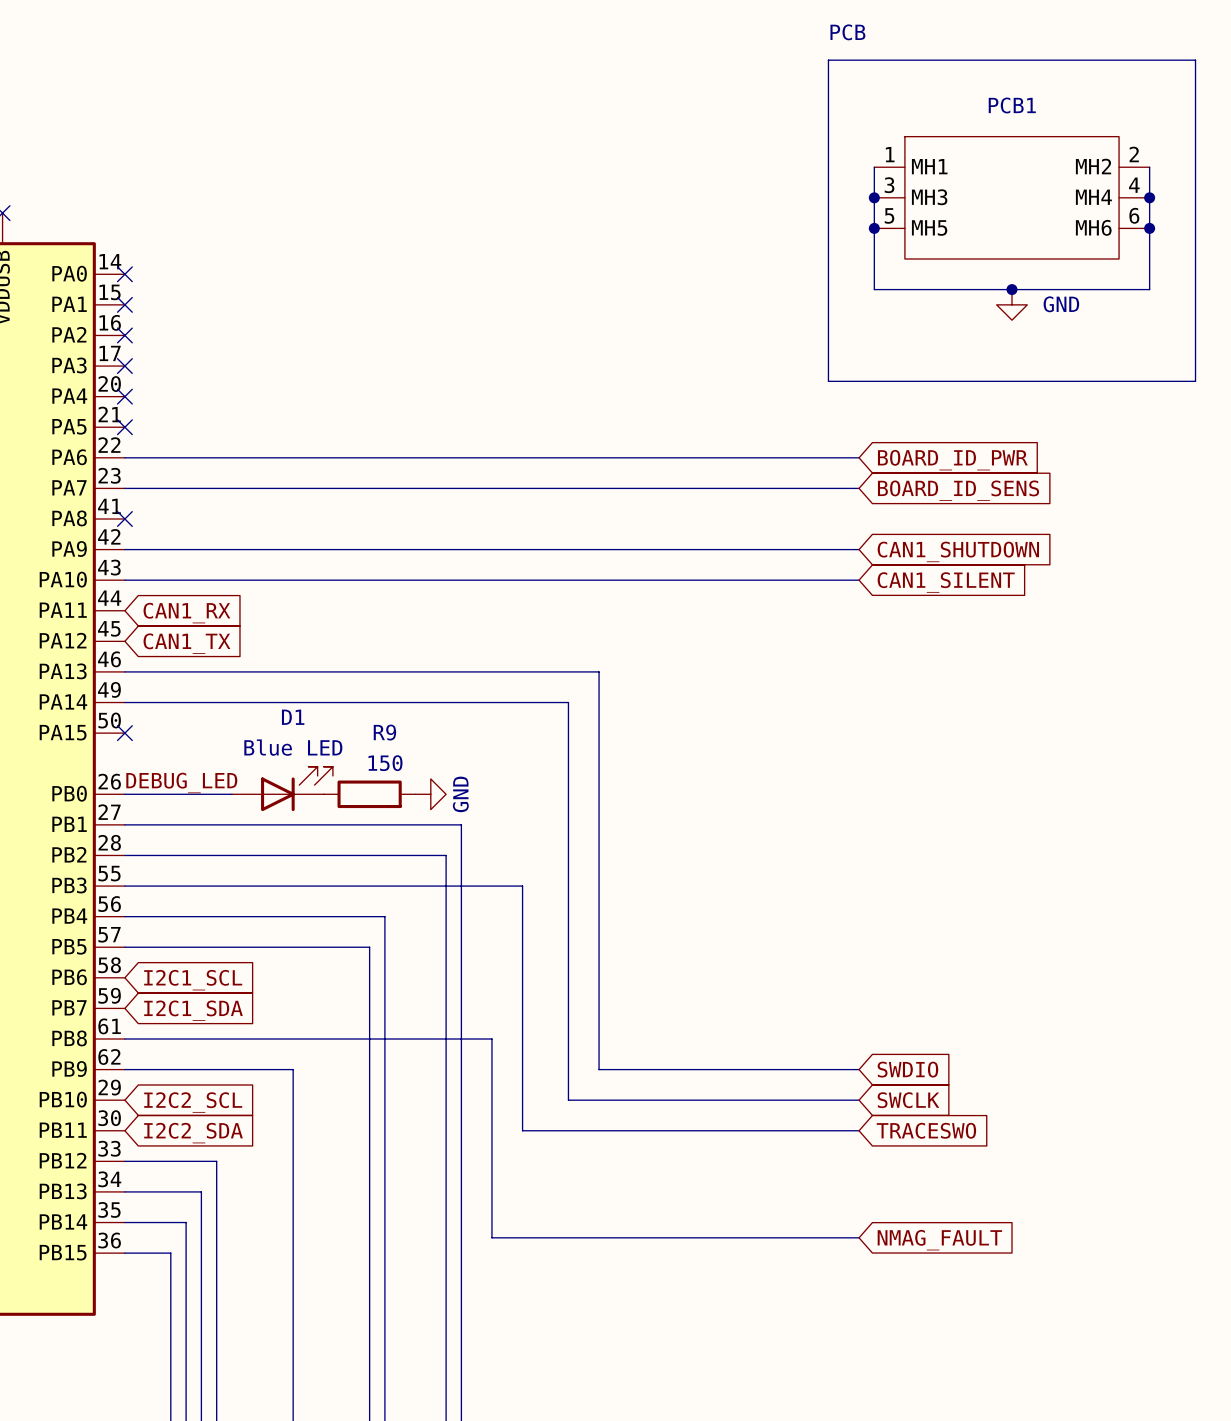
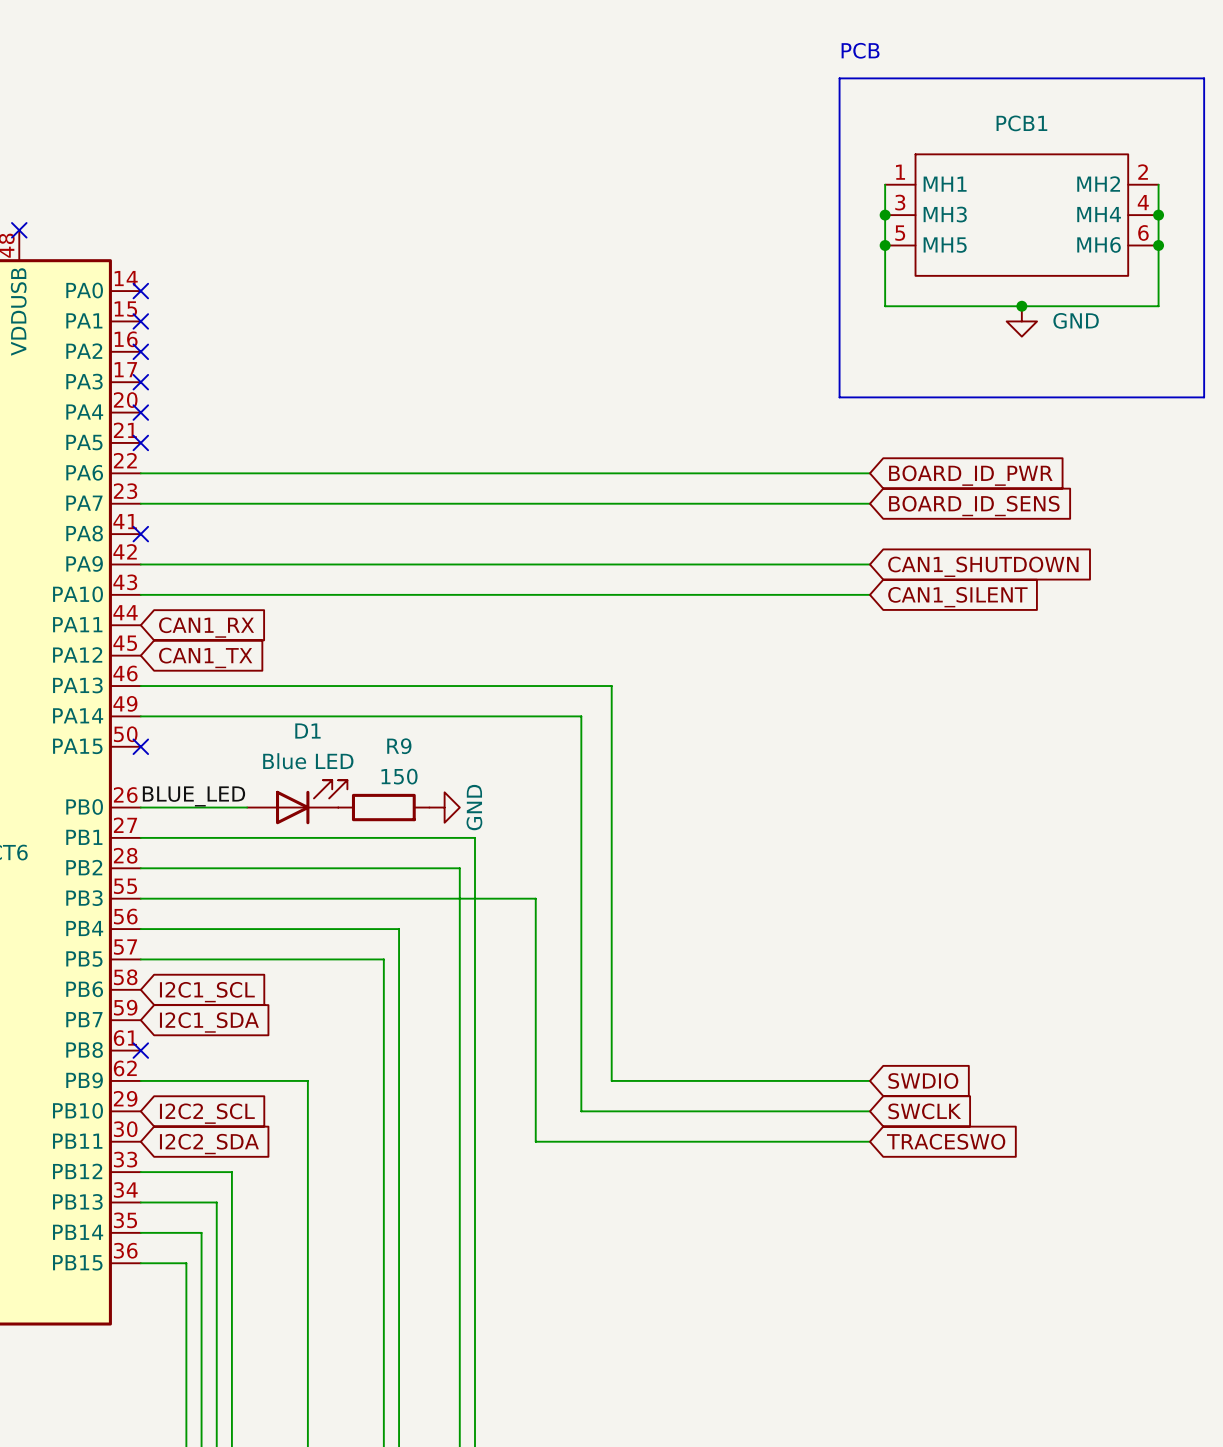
label: DEBUG_LED (181, 782) -> BLUE_LED (193, 796)
wire: (124, 1039) (491, 1039) (491, 1237) (859, 1237) -> none
no-connect mark: none -> (140, 1050)
global label: NMAG_FAULT (939, 1240) -> none

